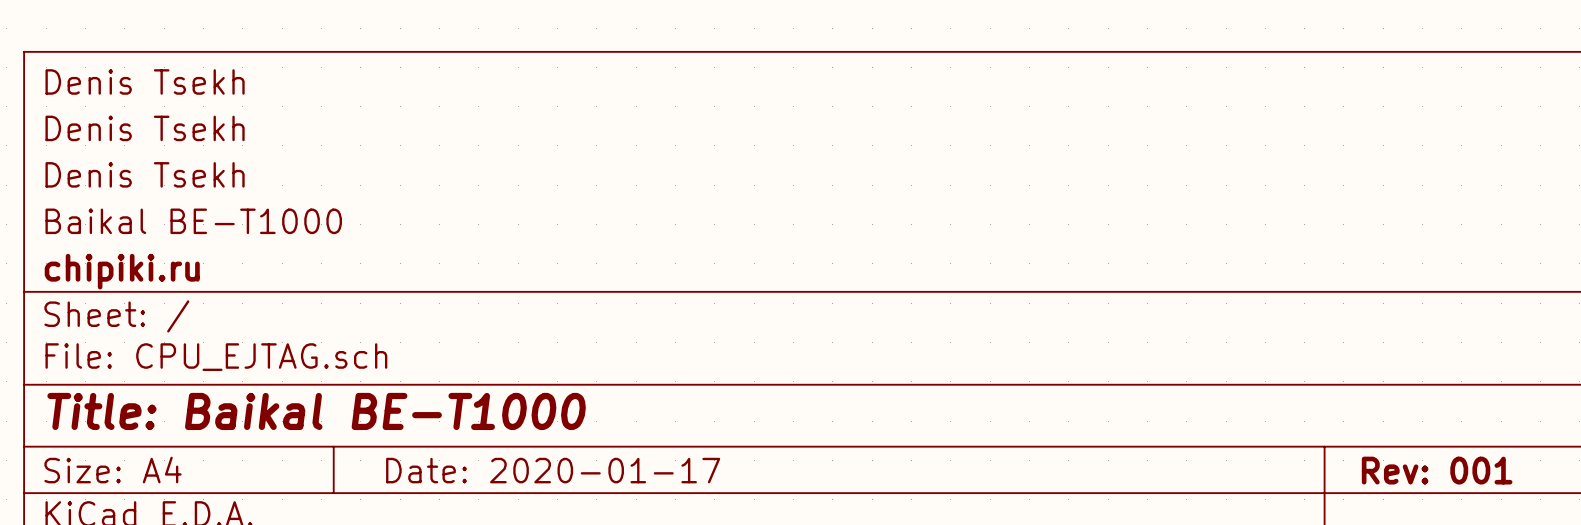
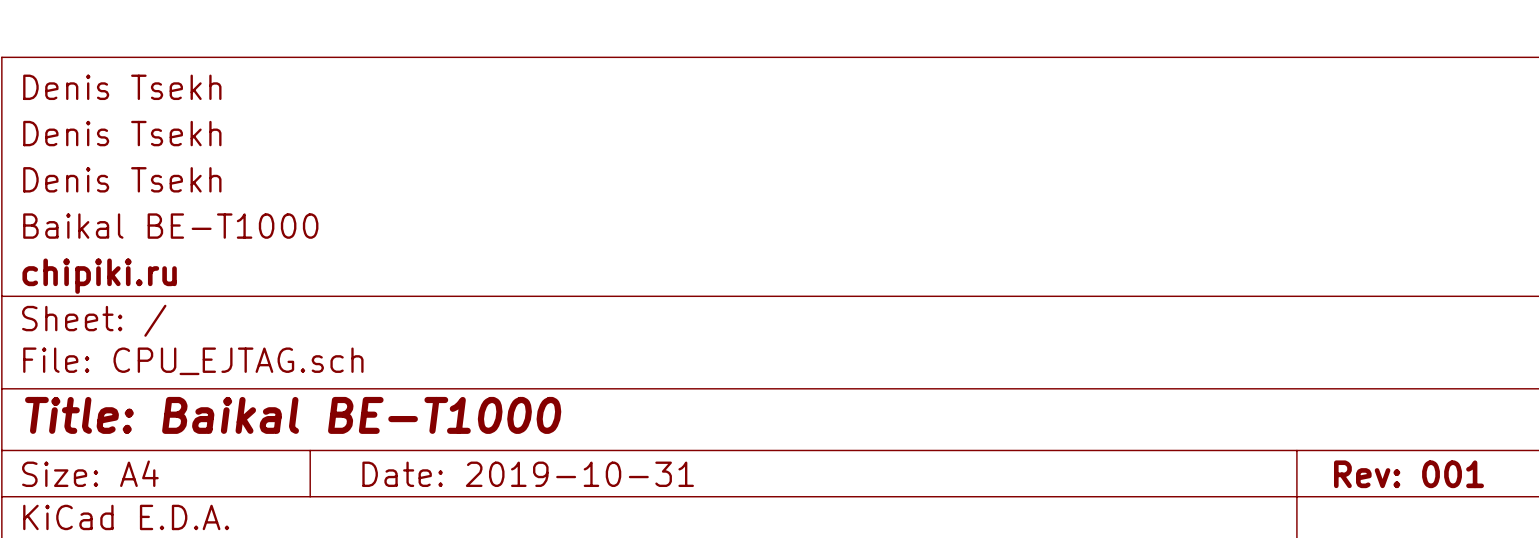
title block: Date: 2020-01-17 (553, 470) -> Date: 2019-10-31 (528, 474)

